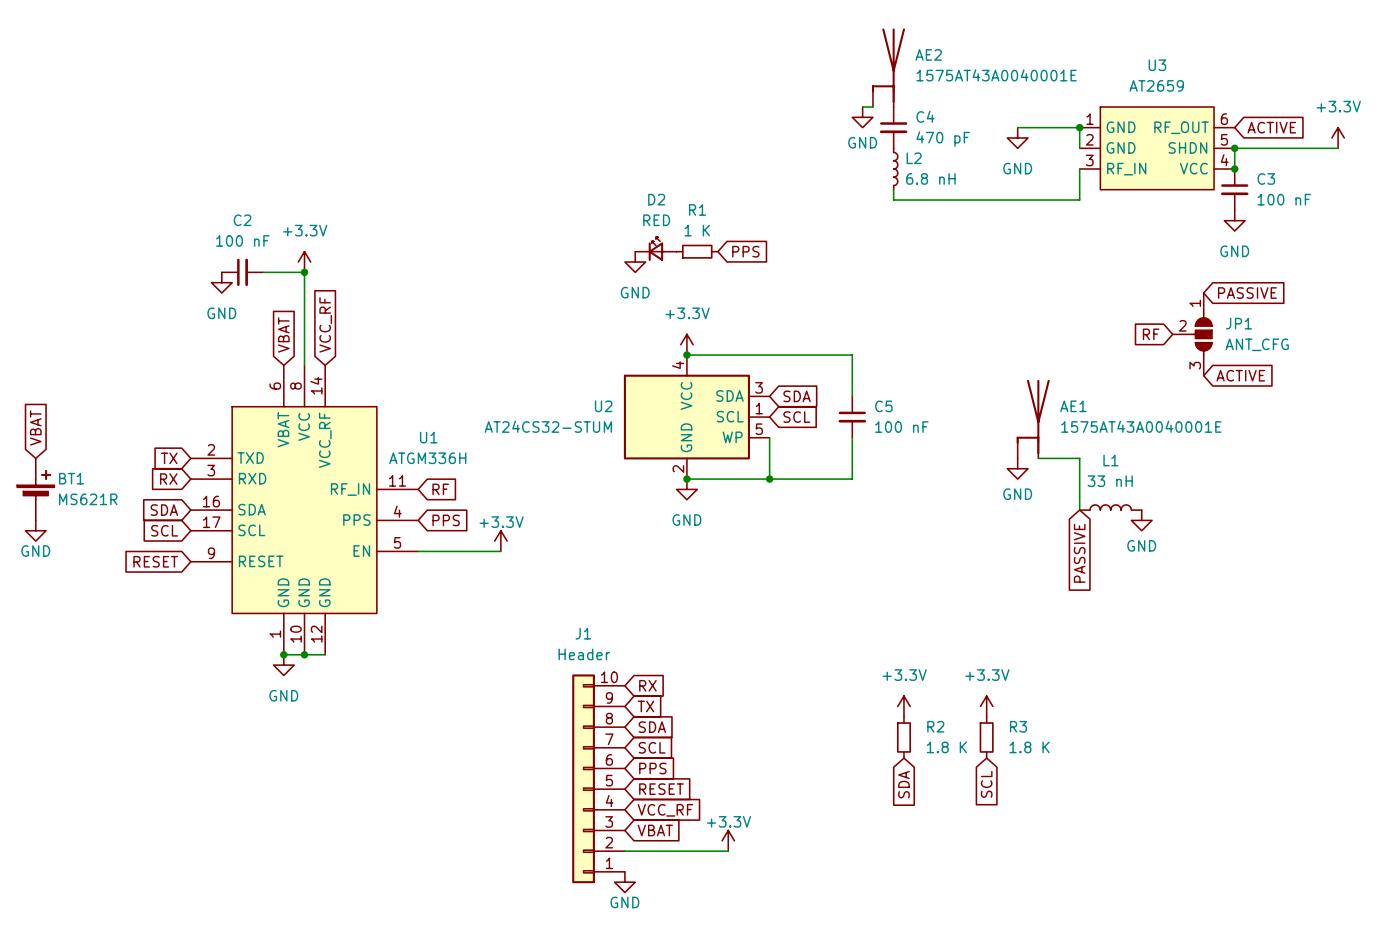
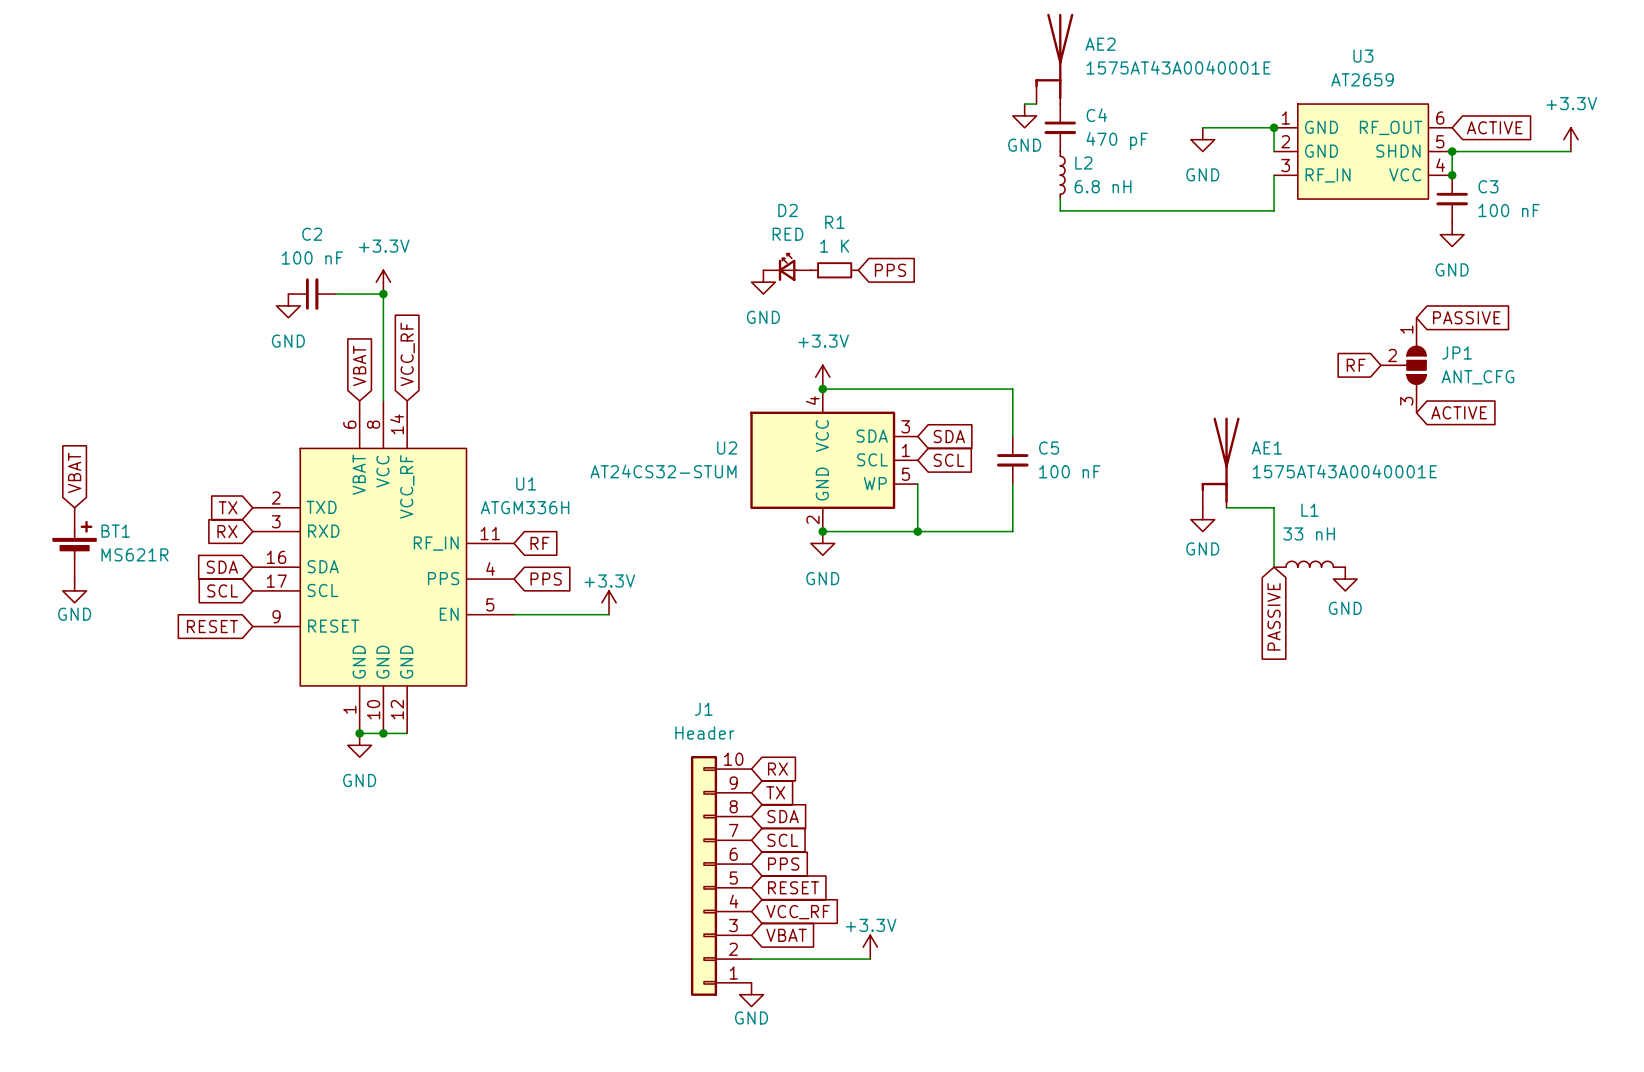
power symbol: +3.3V (903, 706) -> none
power symbol: +3.3V (986, 706) -> none
R2: 1.8 K (903, 737) -> none
R3: 1.8 K (986, 737) -> none
global label: SDA (903, 784) -> none
global label: SCL (986, 784) -> none

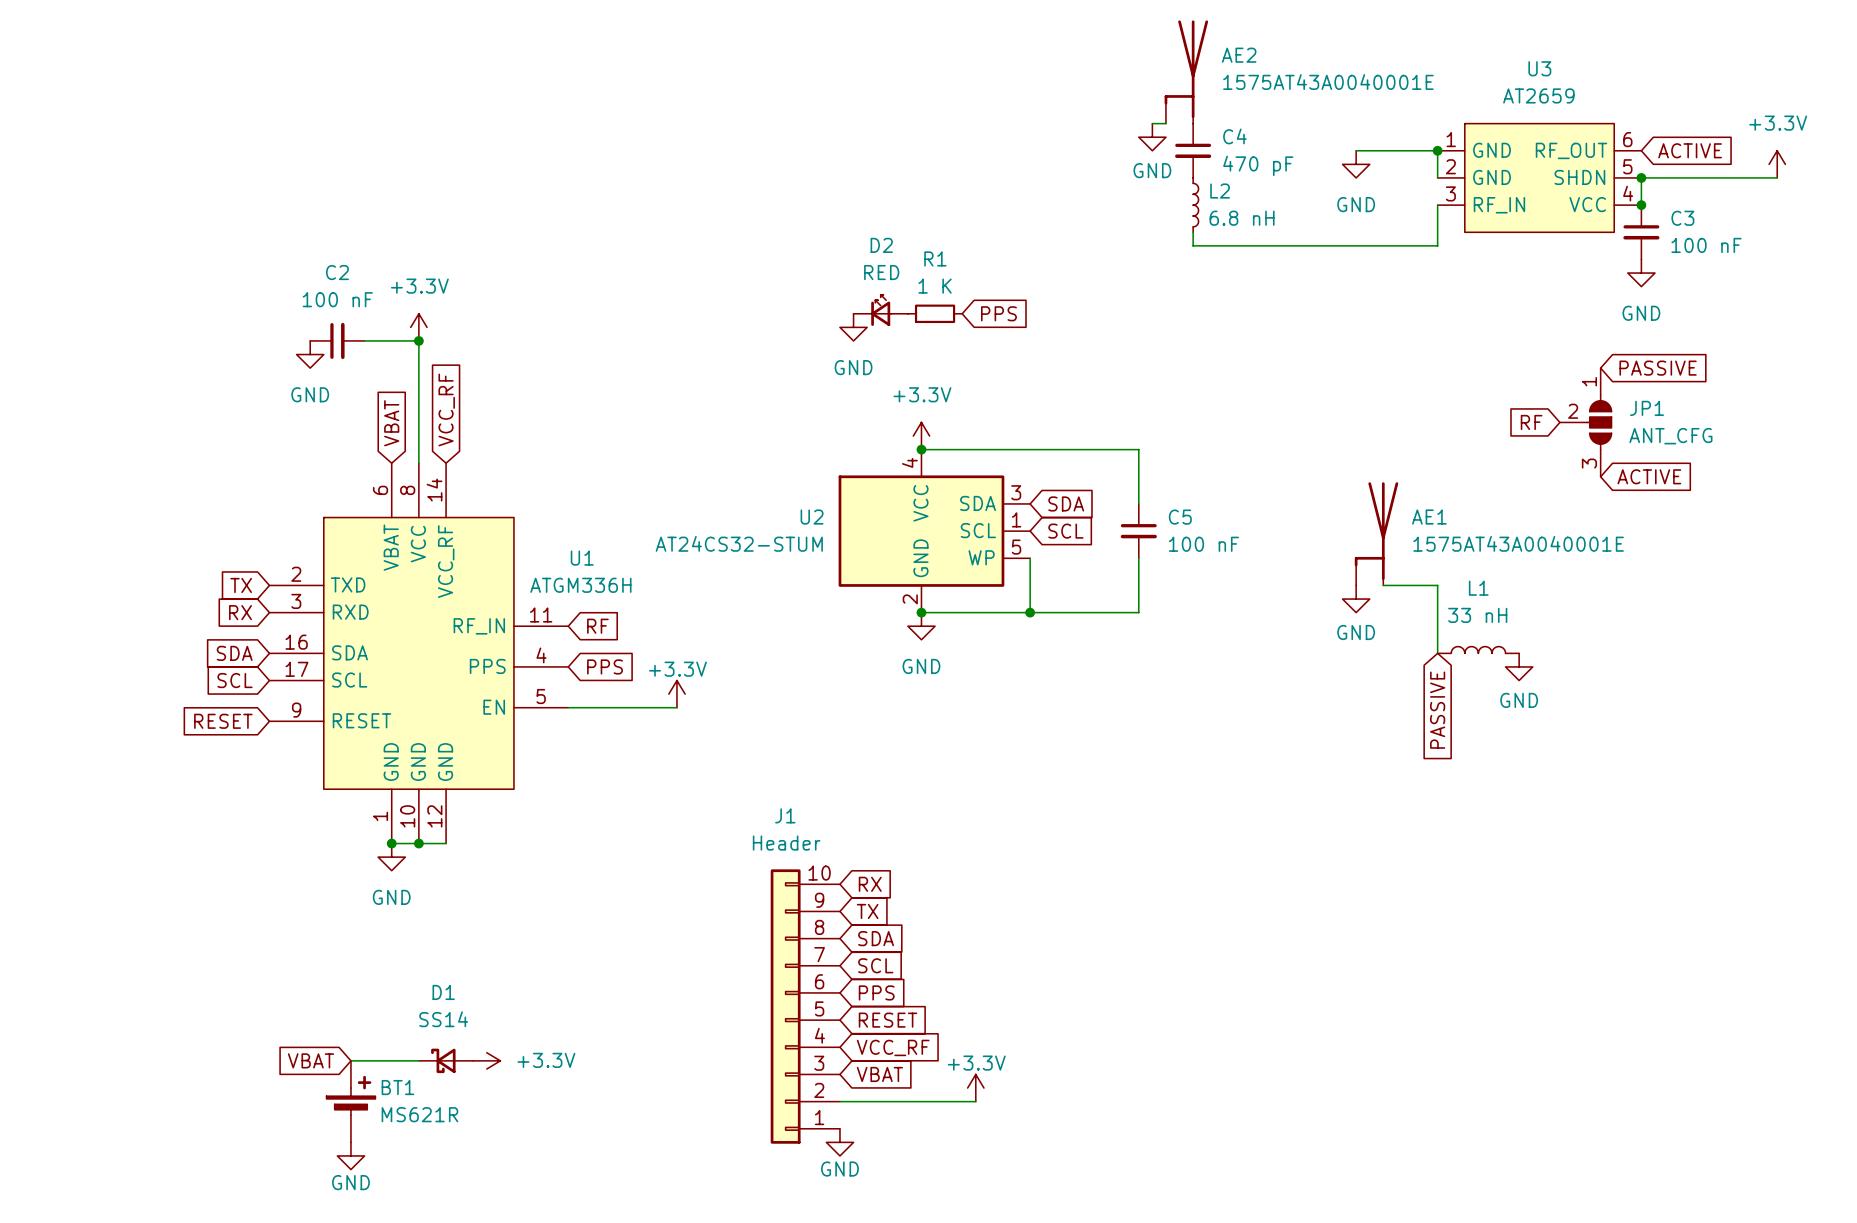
global label: VBAT (74, 472) -> none
BT1 position: (74, 543) -> (350, 1101)
power symbol: GND (74, 590) -> none
global label: none -> VBAT (311, 1060)
wire: none -> (350, 1060) (418, 1060)
D1: none -> SS14 (446, 1060)
power symbol: none -> +3.3V (486, 1060)
power symbol: none -> GND (350, 1155)

